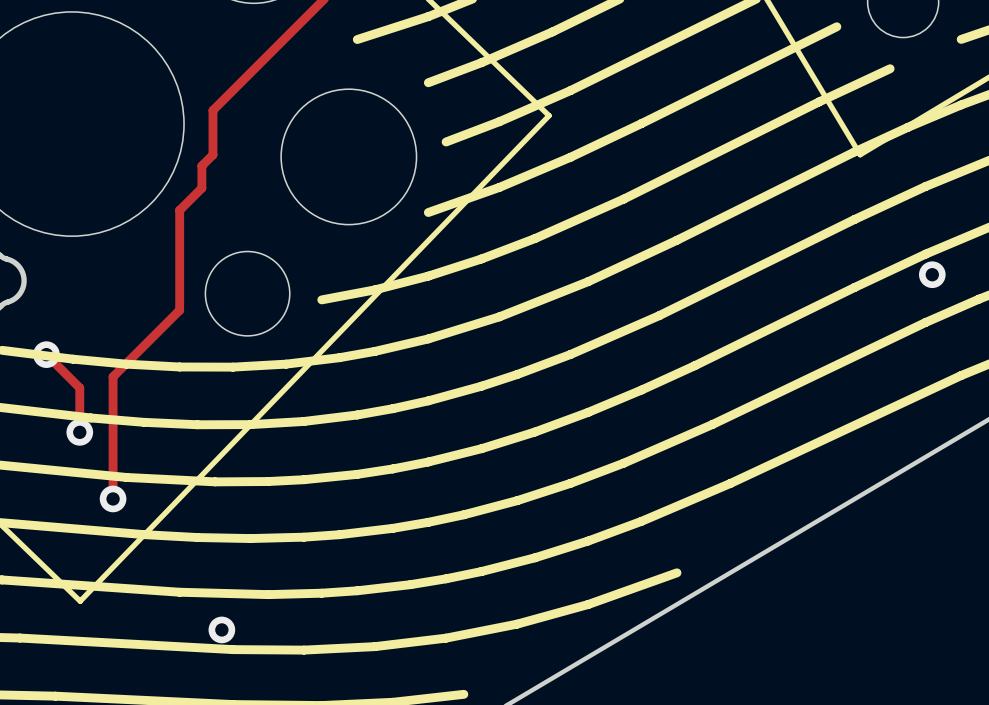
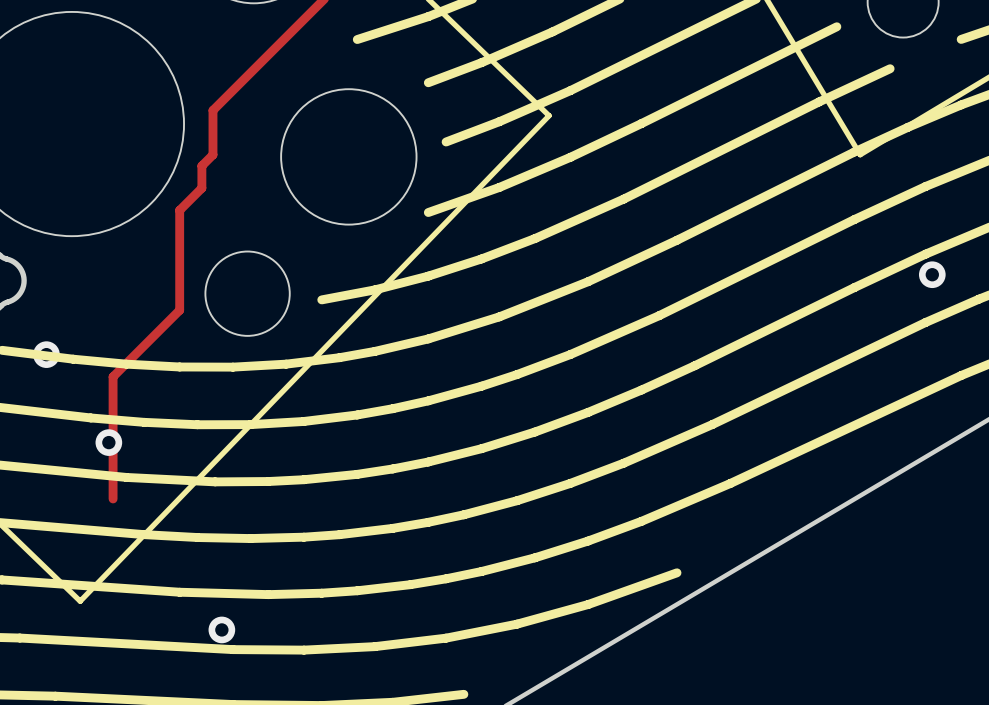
track: (46, 354) (79, 387) (79, 432) -> none
via: (79, 432) -> none
via: none -> (108, 442)
via: (113, 498) -> none

